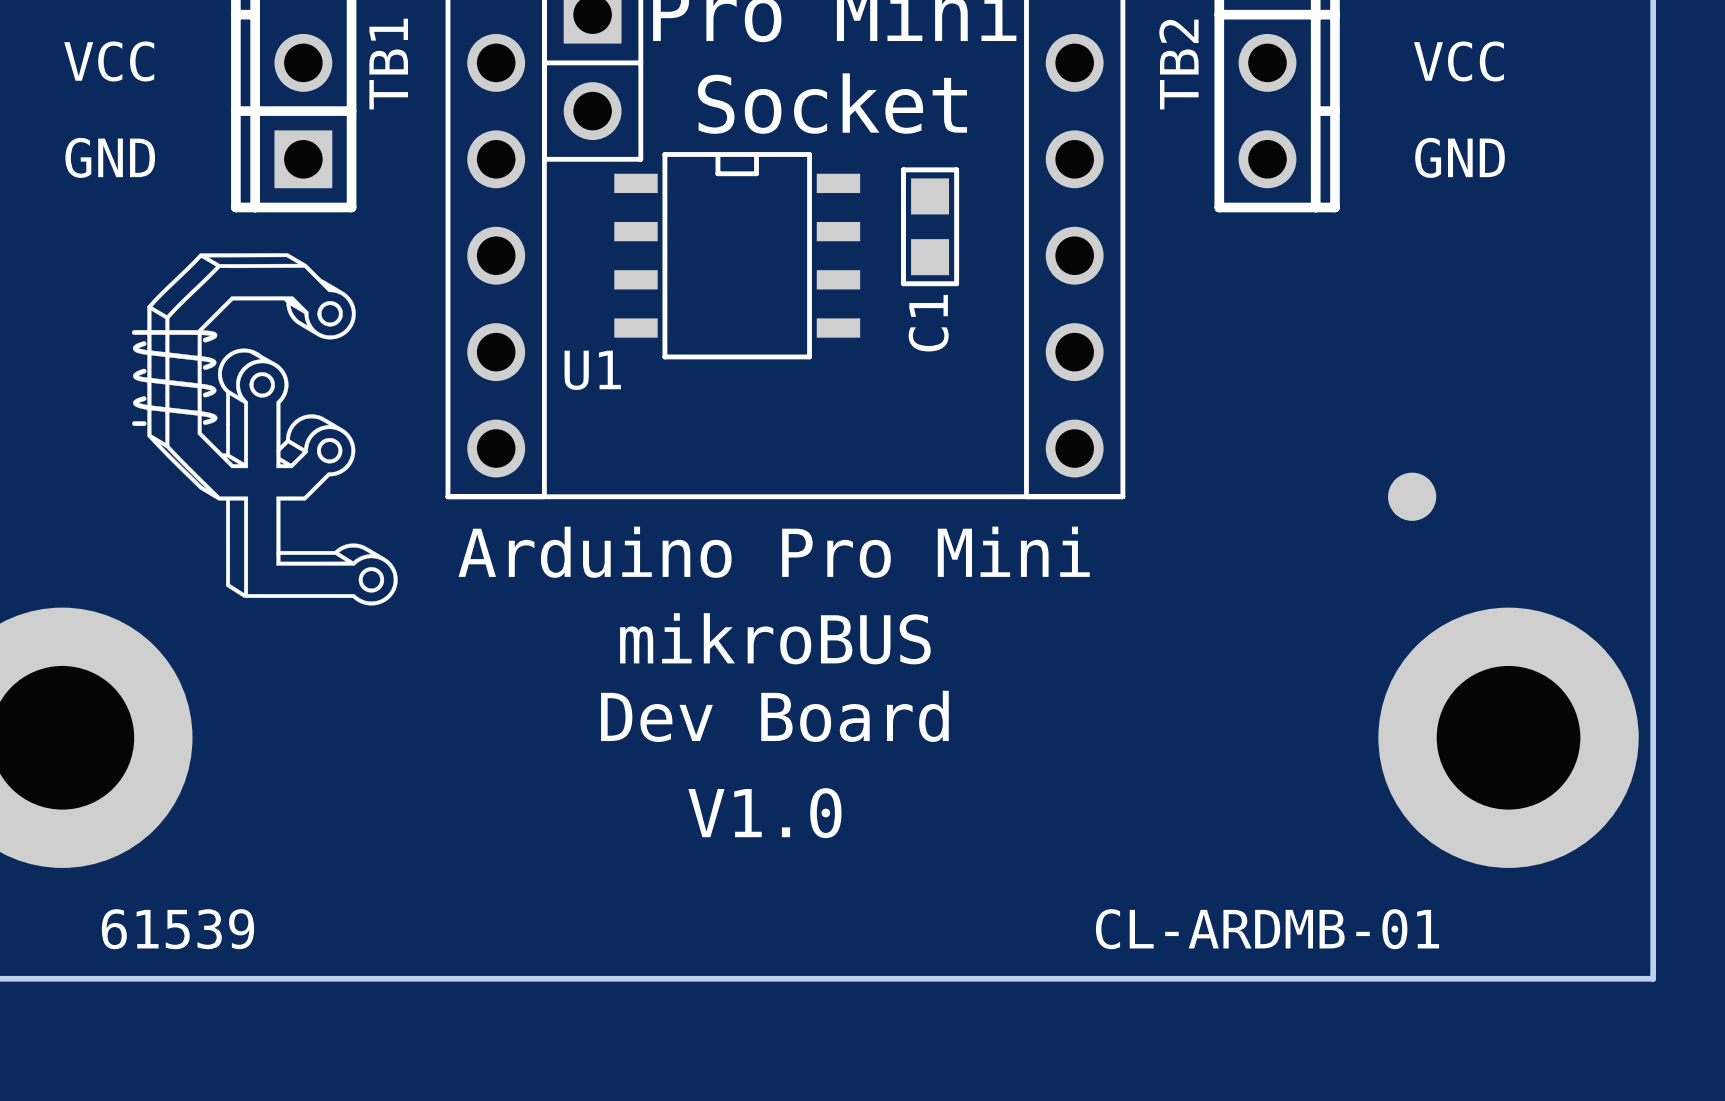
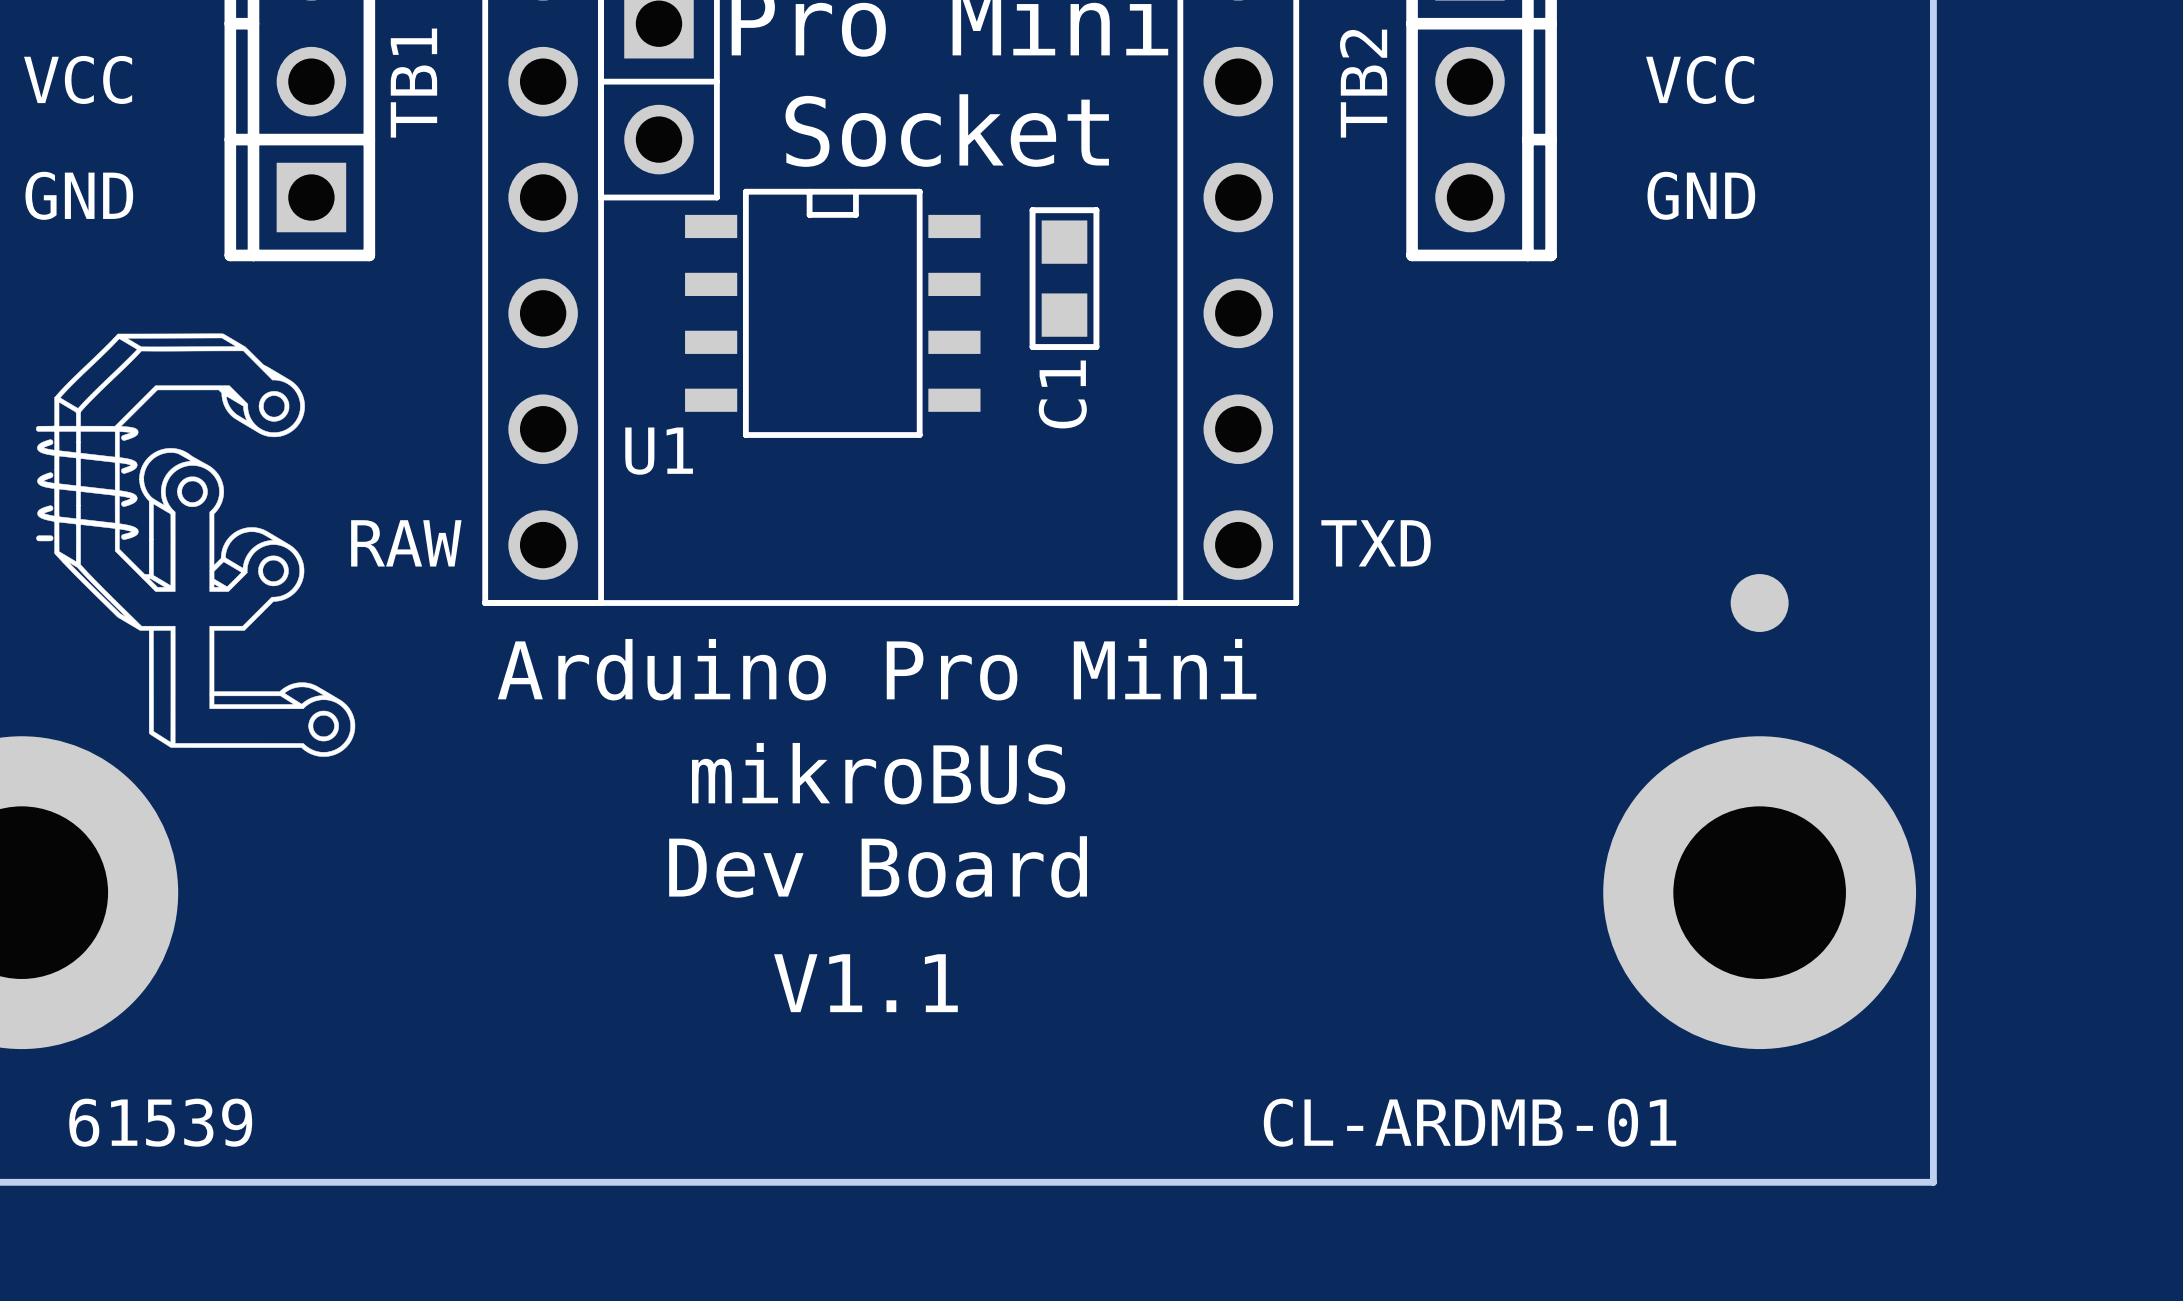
drawing position: (264, 429) -> (195, 545)
text: none -> RAW (406, 543)
text: none -> TXD (1376, 543)
part position: (1412, 496) -> (1759, 603)
text: V1.0 (764, 813) -> V1.1 (865, 983)

